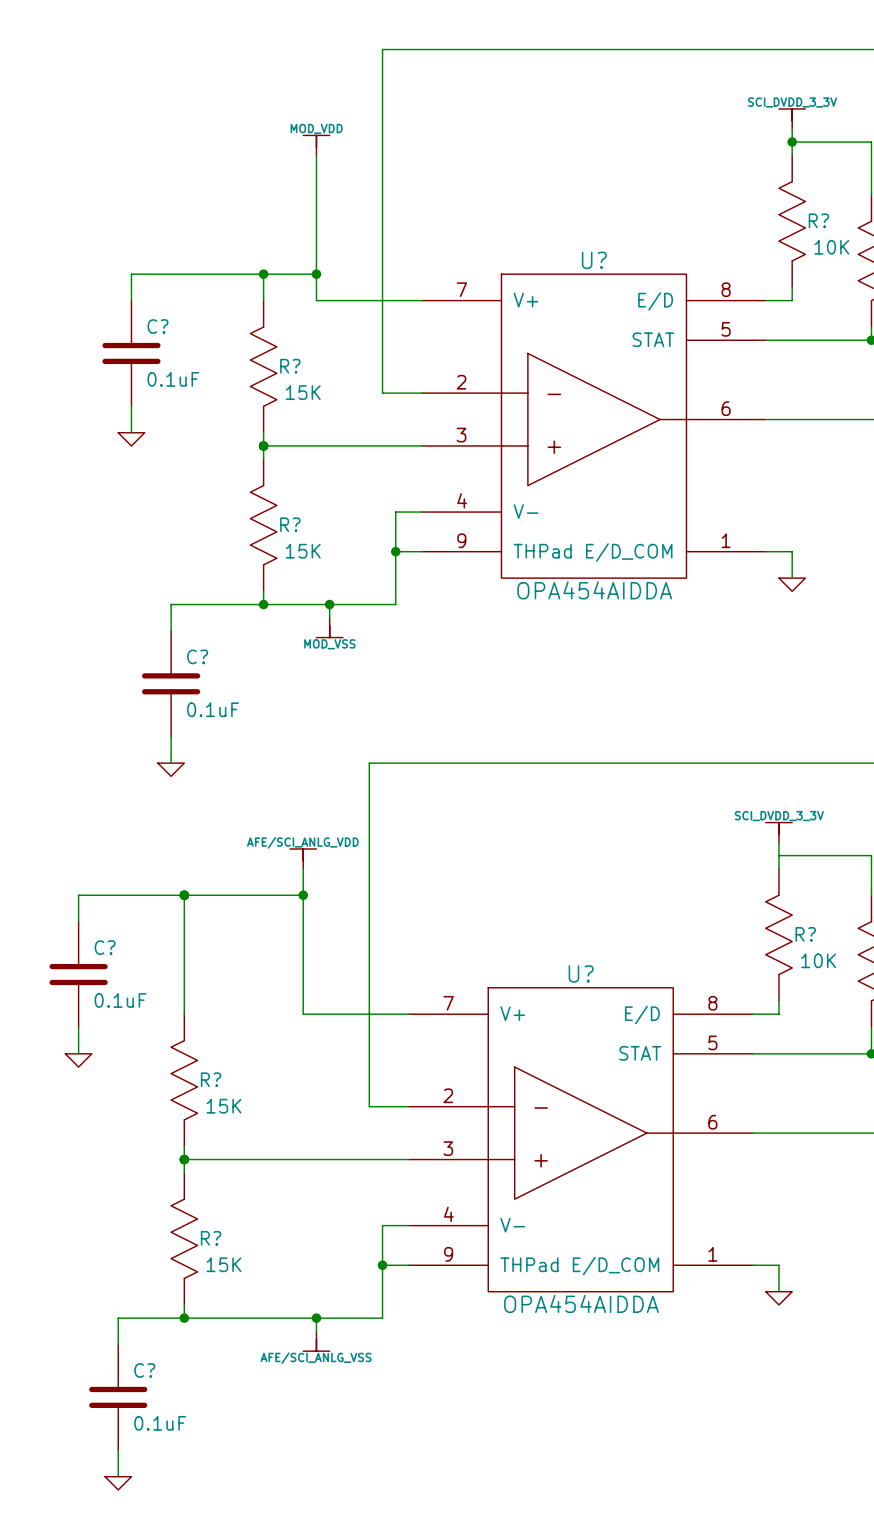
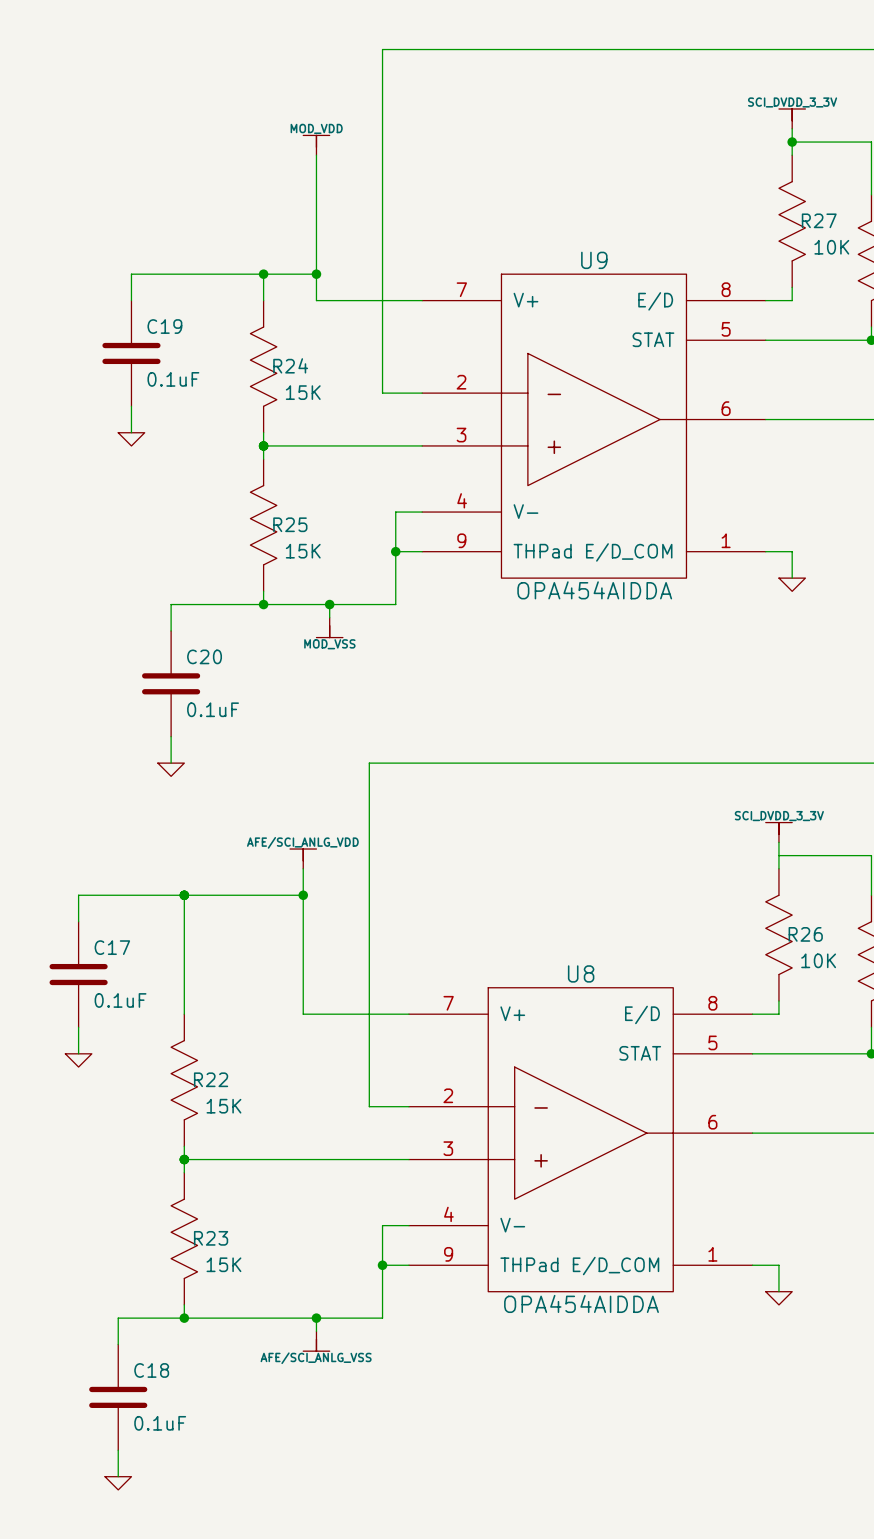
R? name: R? (818, 220) -> R27 (819, 220)
U? name: U? (594, 260) -> U9 (594, 260)
C? name: C? (157, 326) -> C19 (164, 326)
R? name: R? (290, 366) -> R24 (290, 365)
R? name: R? (290, 524) -> R25 (290, 524)
C? name: C? (197, 656) -> C20 (204, 656)
R? name: R? (805, 934) -> R26 (805, 934)
C? name: C? (105, 947) -> C17 (112, 947)
U? name: U? (581, 973) -> U8 (581, 973)
R? name: R? (211, 1079) -> R22 (211, 1079)
R? name: R? (211, 1238) -> R23 (211, 1238)
C? name: C? (144, 1370) -> C18 (151, 1370)

